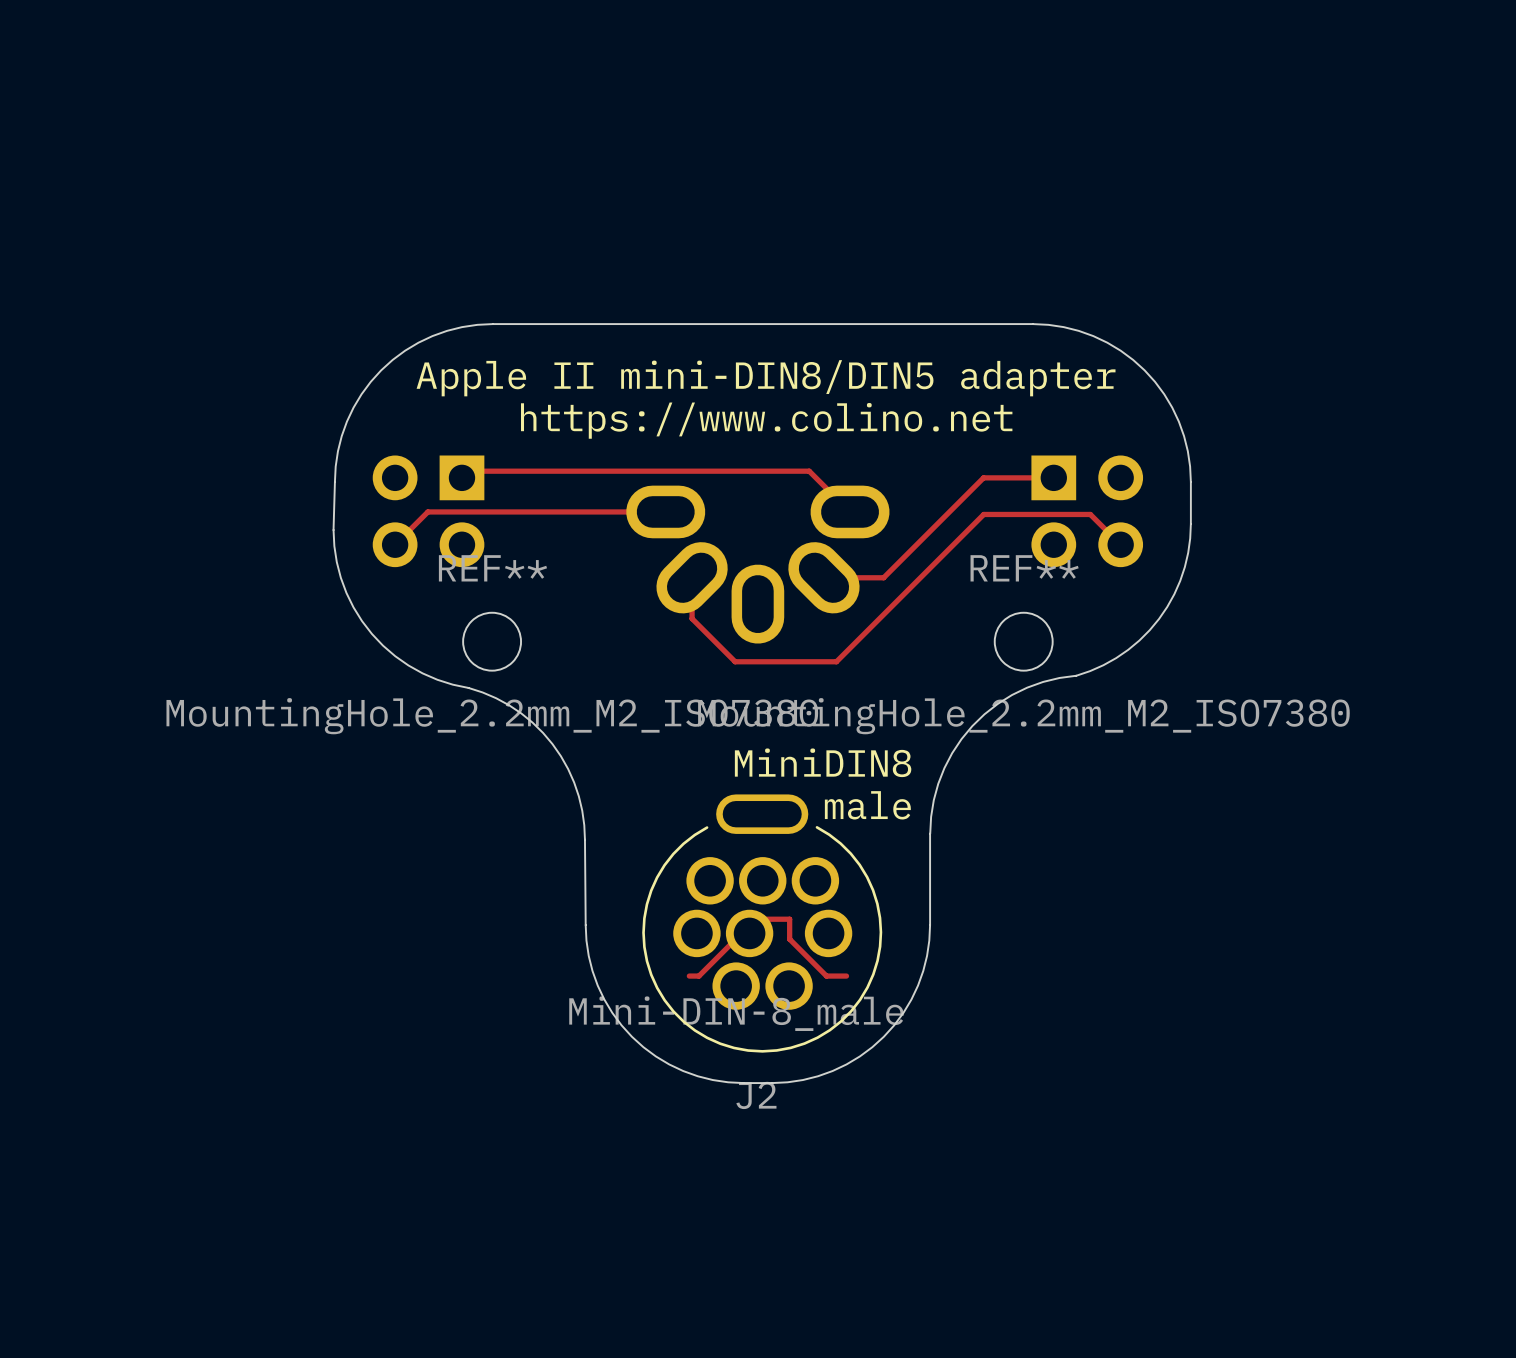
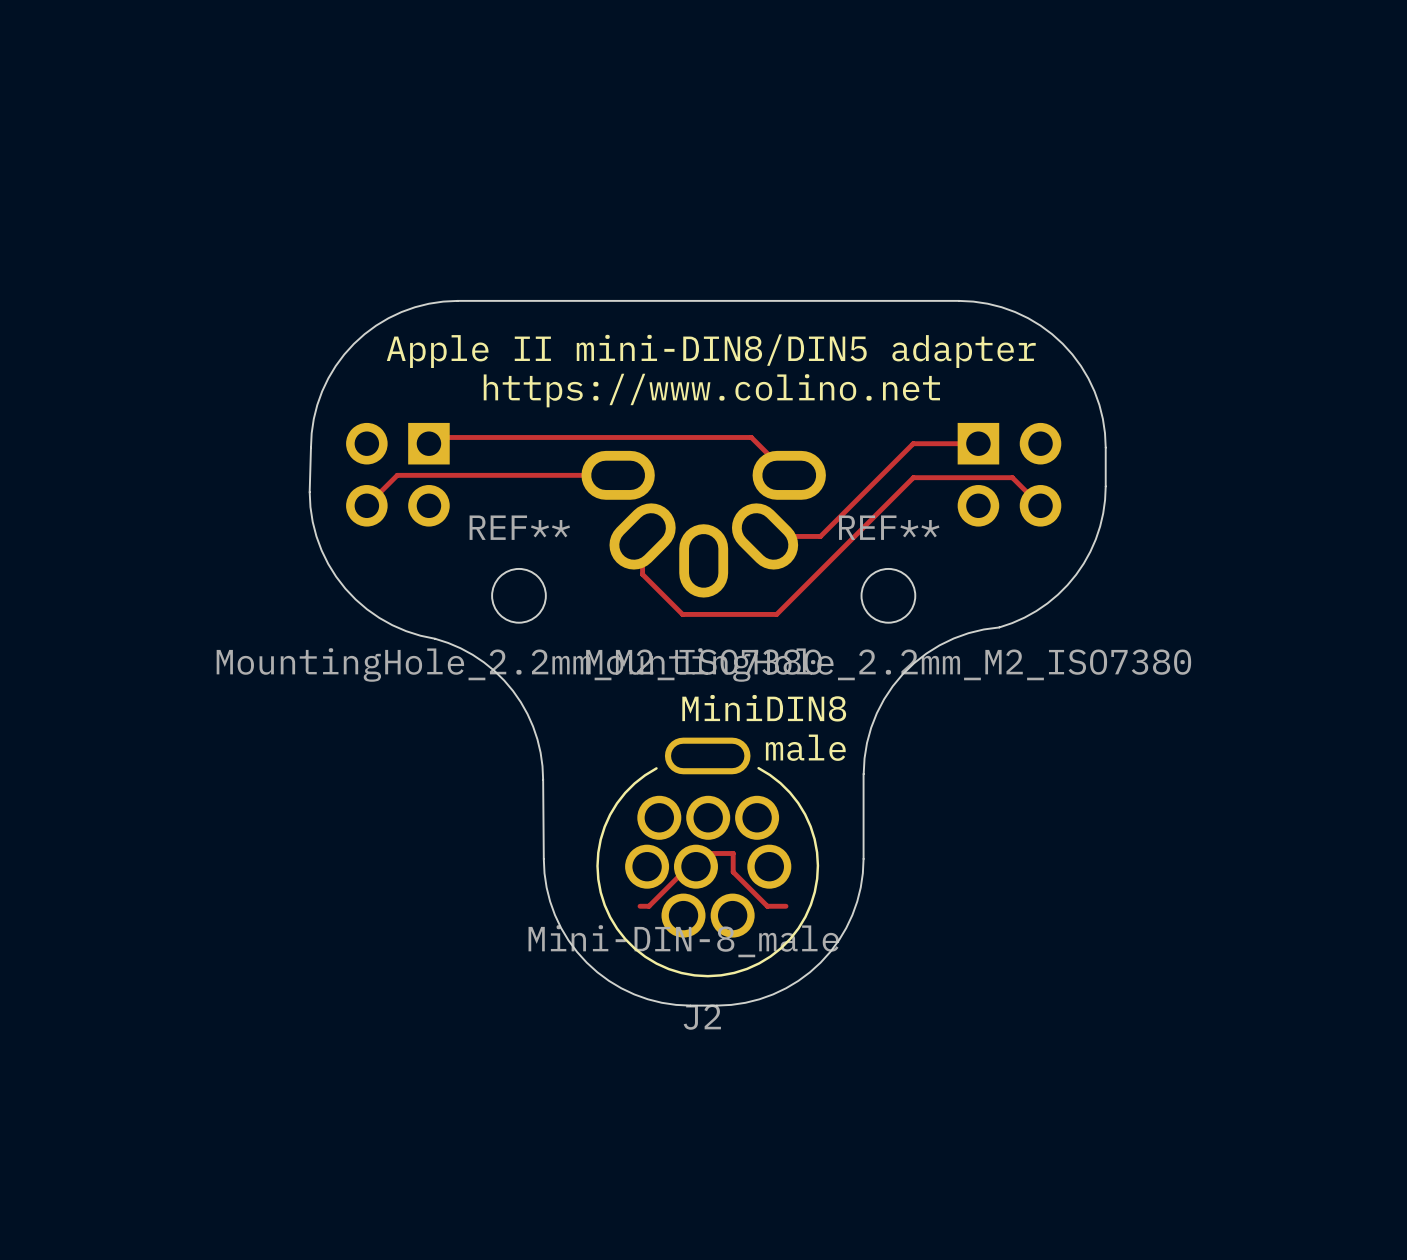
REF** position: (492, 641) -> (518, 595)
REF** position: (1023, 641) -> (888, 595)

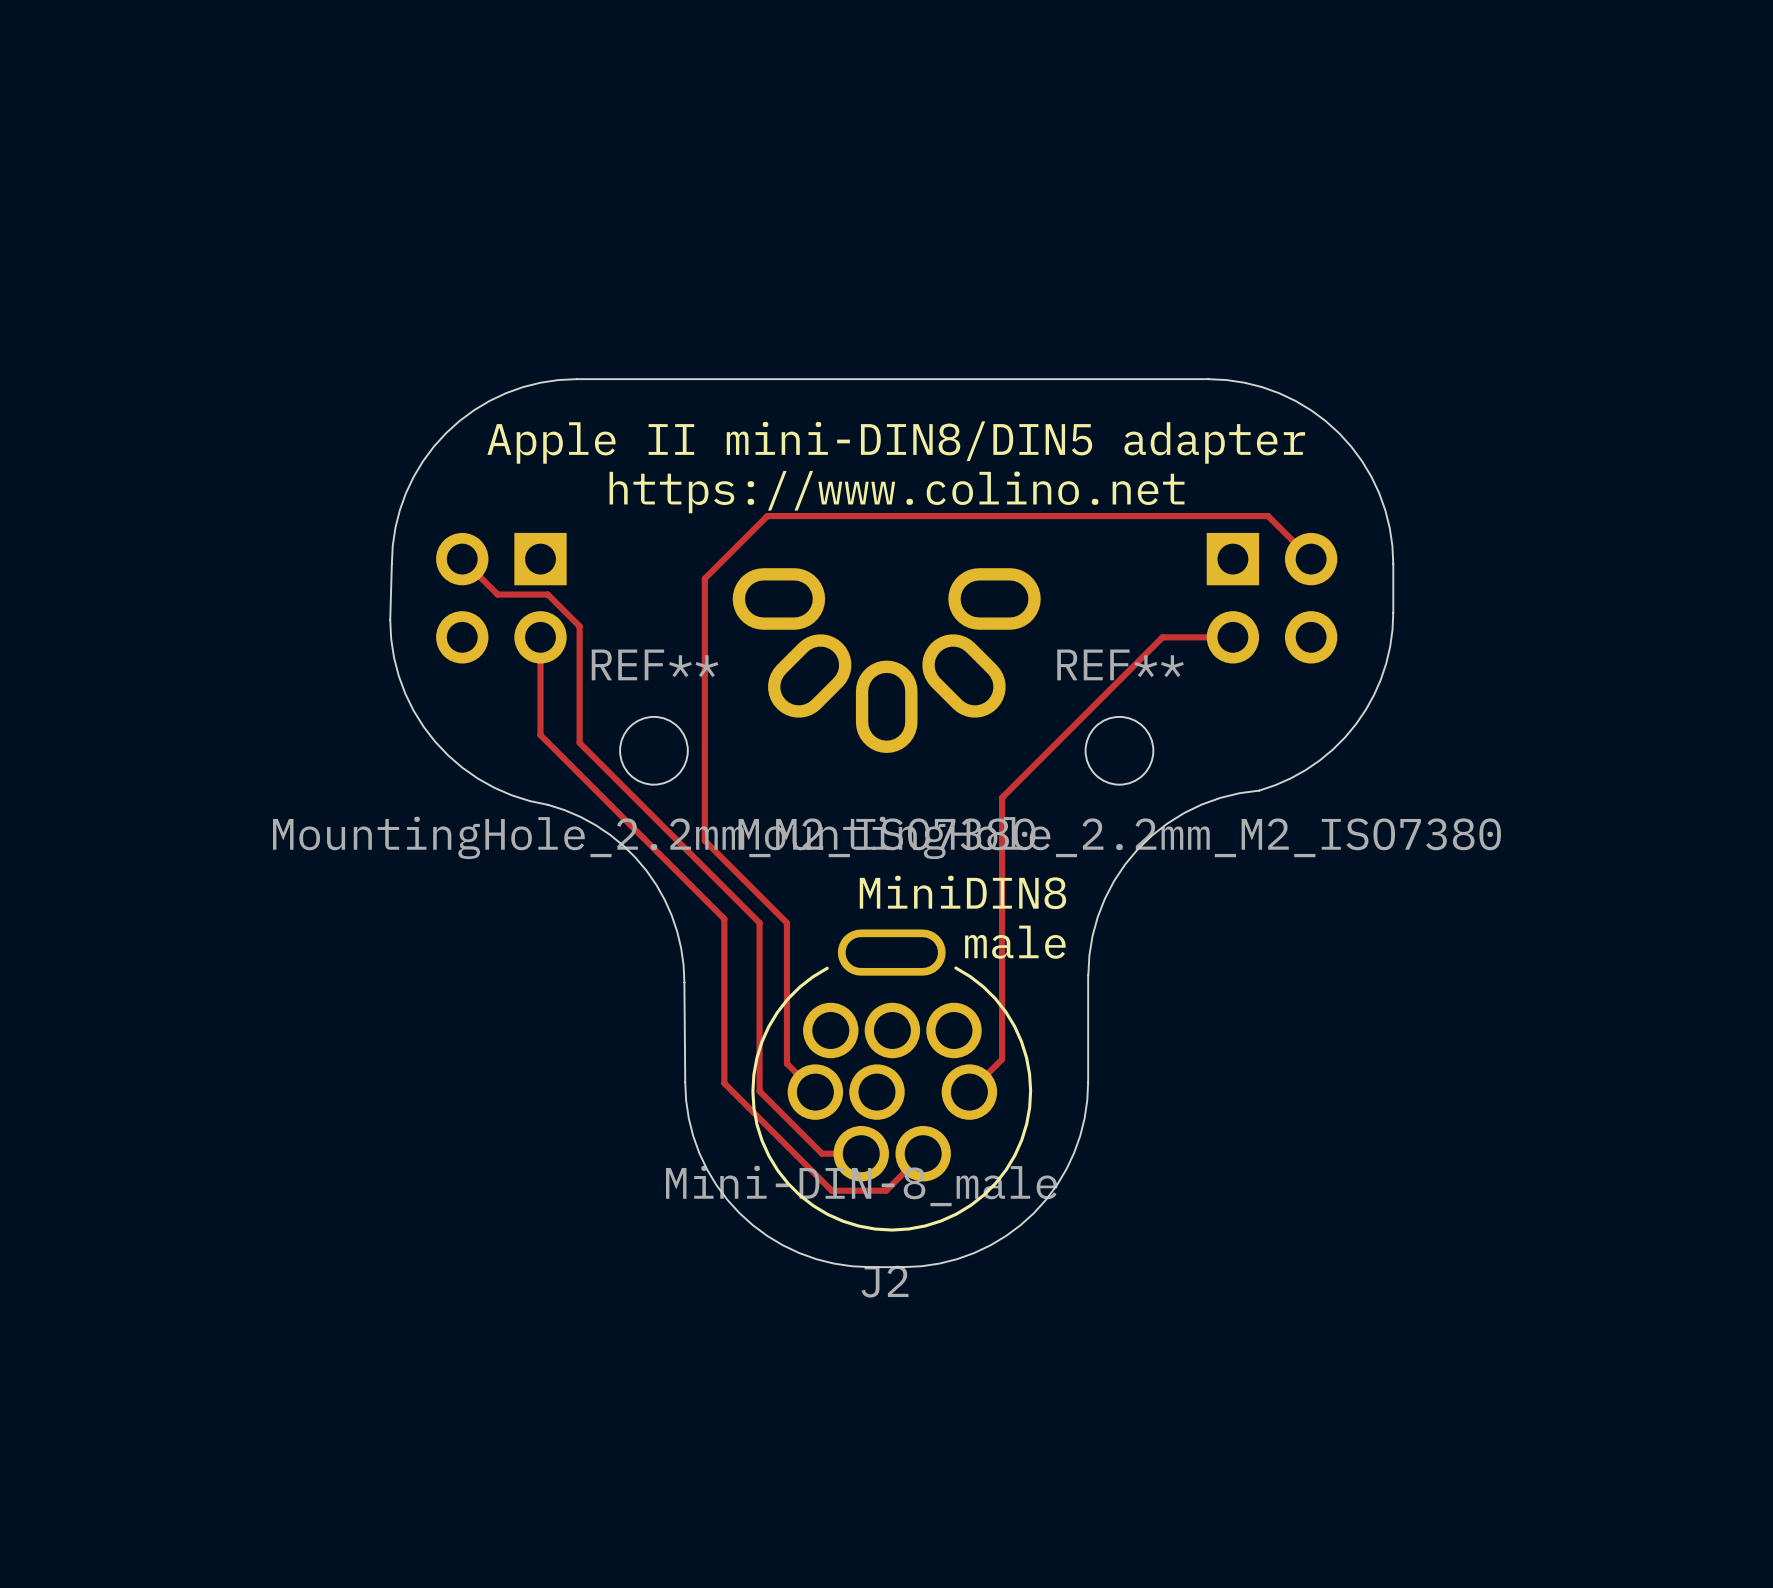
track: none -> (462, 559) (497, 594) (547, 594) (579, 626) (579, 742) (759, 922) (759, 1091) (822, 1153) (861, 1153)
track: (428, 443) (435, 437) (751, 437) (789, 475) -> none
track: (978, 443) (913, 443) (820, 536) (765, 536) -> none
track: none -> (1311, 559) (1268, 516) (767, 516) (704, 578) (704, 840) (786, 922) (786, 1063) (815, 1092)
track: (618, 475) (397, 475) (366, 505) -> none
track: none -> (540, 637) (540, 735) (724, 918) (724, 1083) (831, 1190) (886, 1190) (923, 1153)
track: none -> (1232, 637) (1162, 637) (1002, 797) (1002, 1059) (969, 1092)
track: (1040, 505) (1012, 477) (913, 477) (776, 614) (682, 614) (642, 574) (642, 536) -> none
track: (640, 906) (649, 906) (688, 866) (695, 866) (709, 853) (733, 853) (733, 872) (767, 906) (785, 906) -> none

